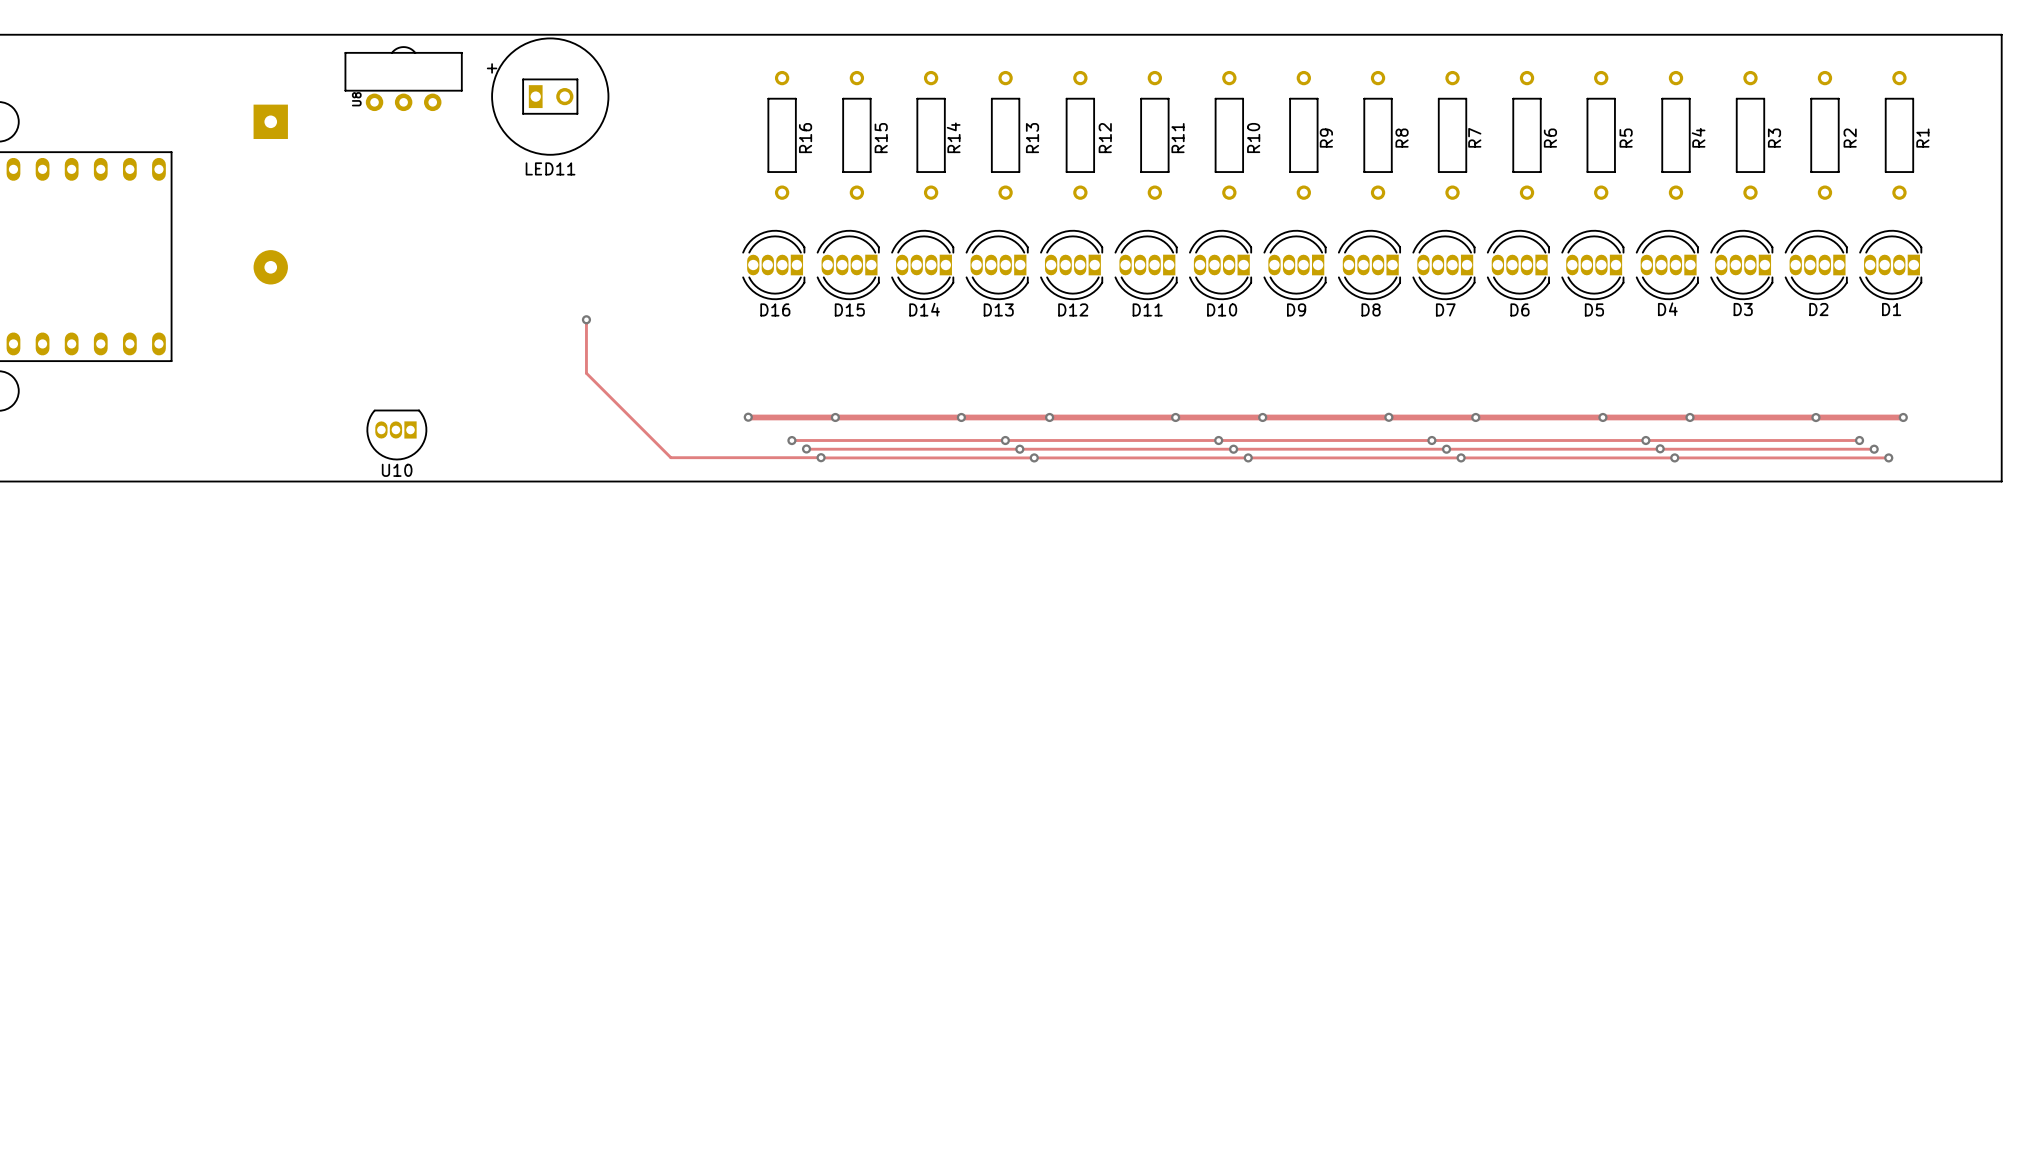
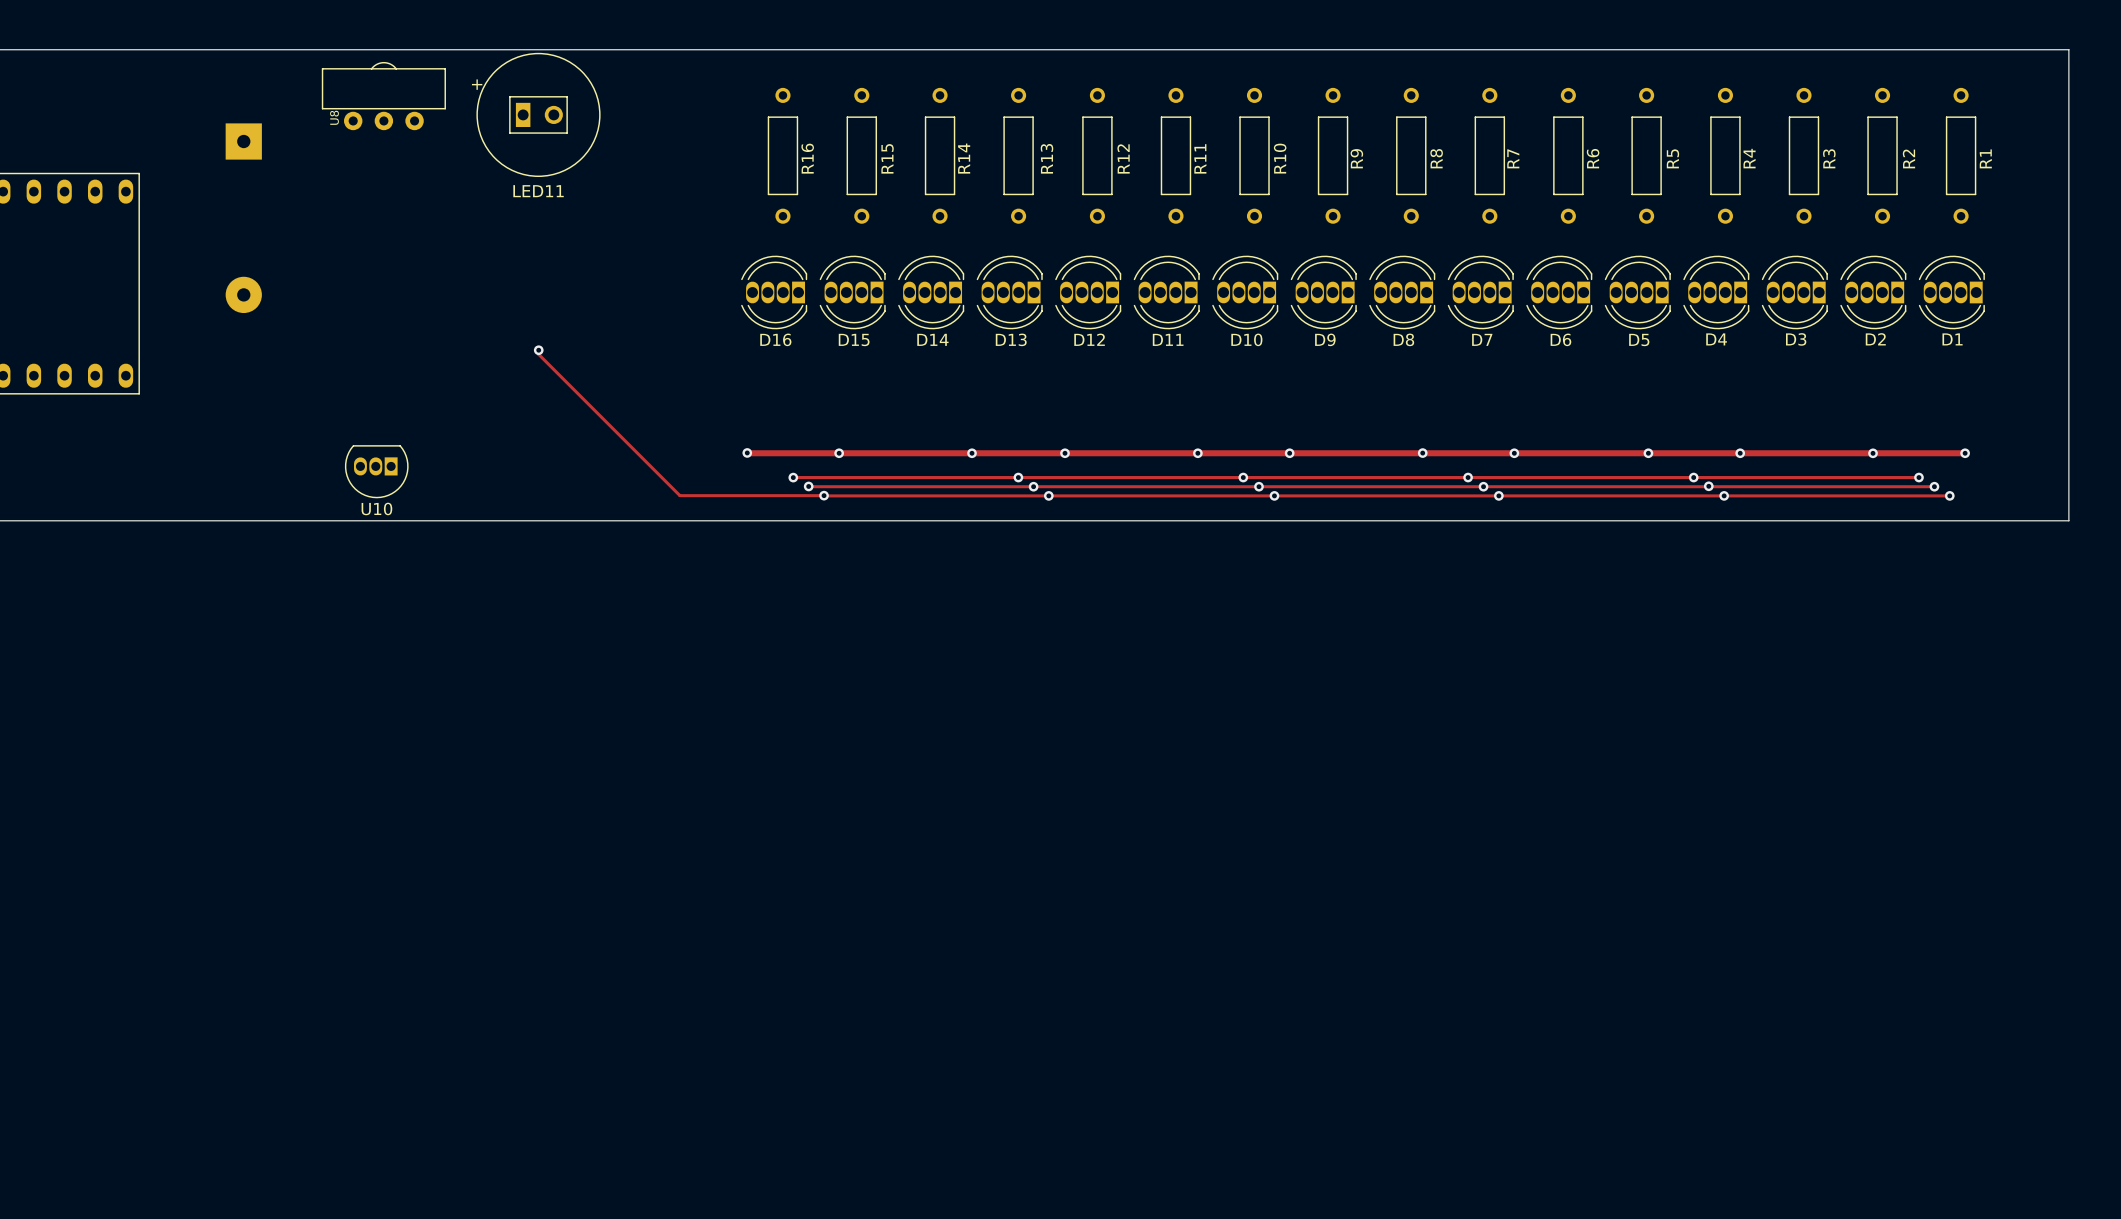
track: (586, 319) (586, 373) (670, 457) (684, 457) -> (538, 350) (538, 354) (679, 495)
via position: (586, 319) -> (538, 350)

